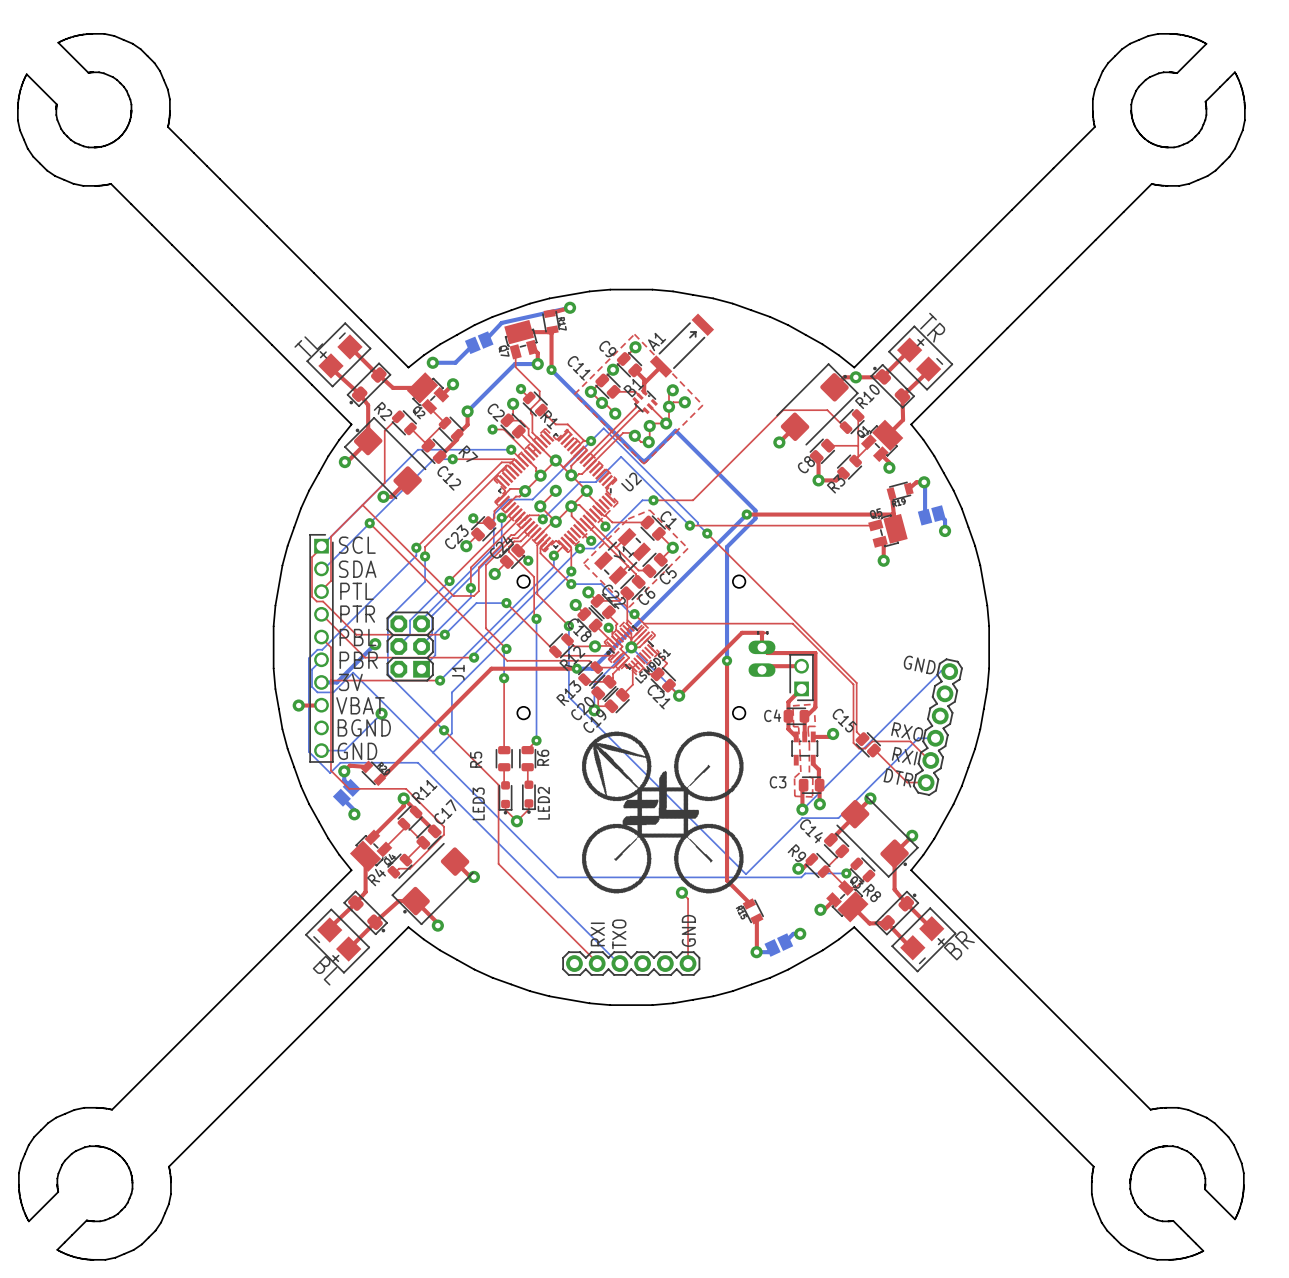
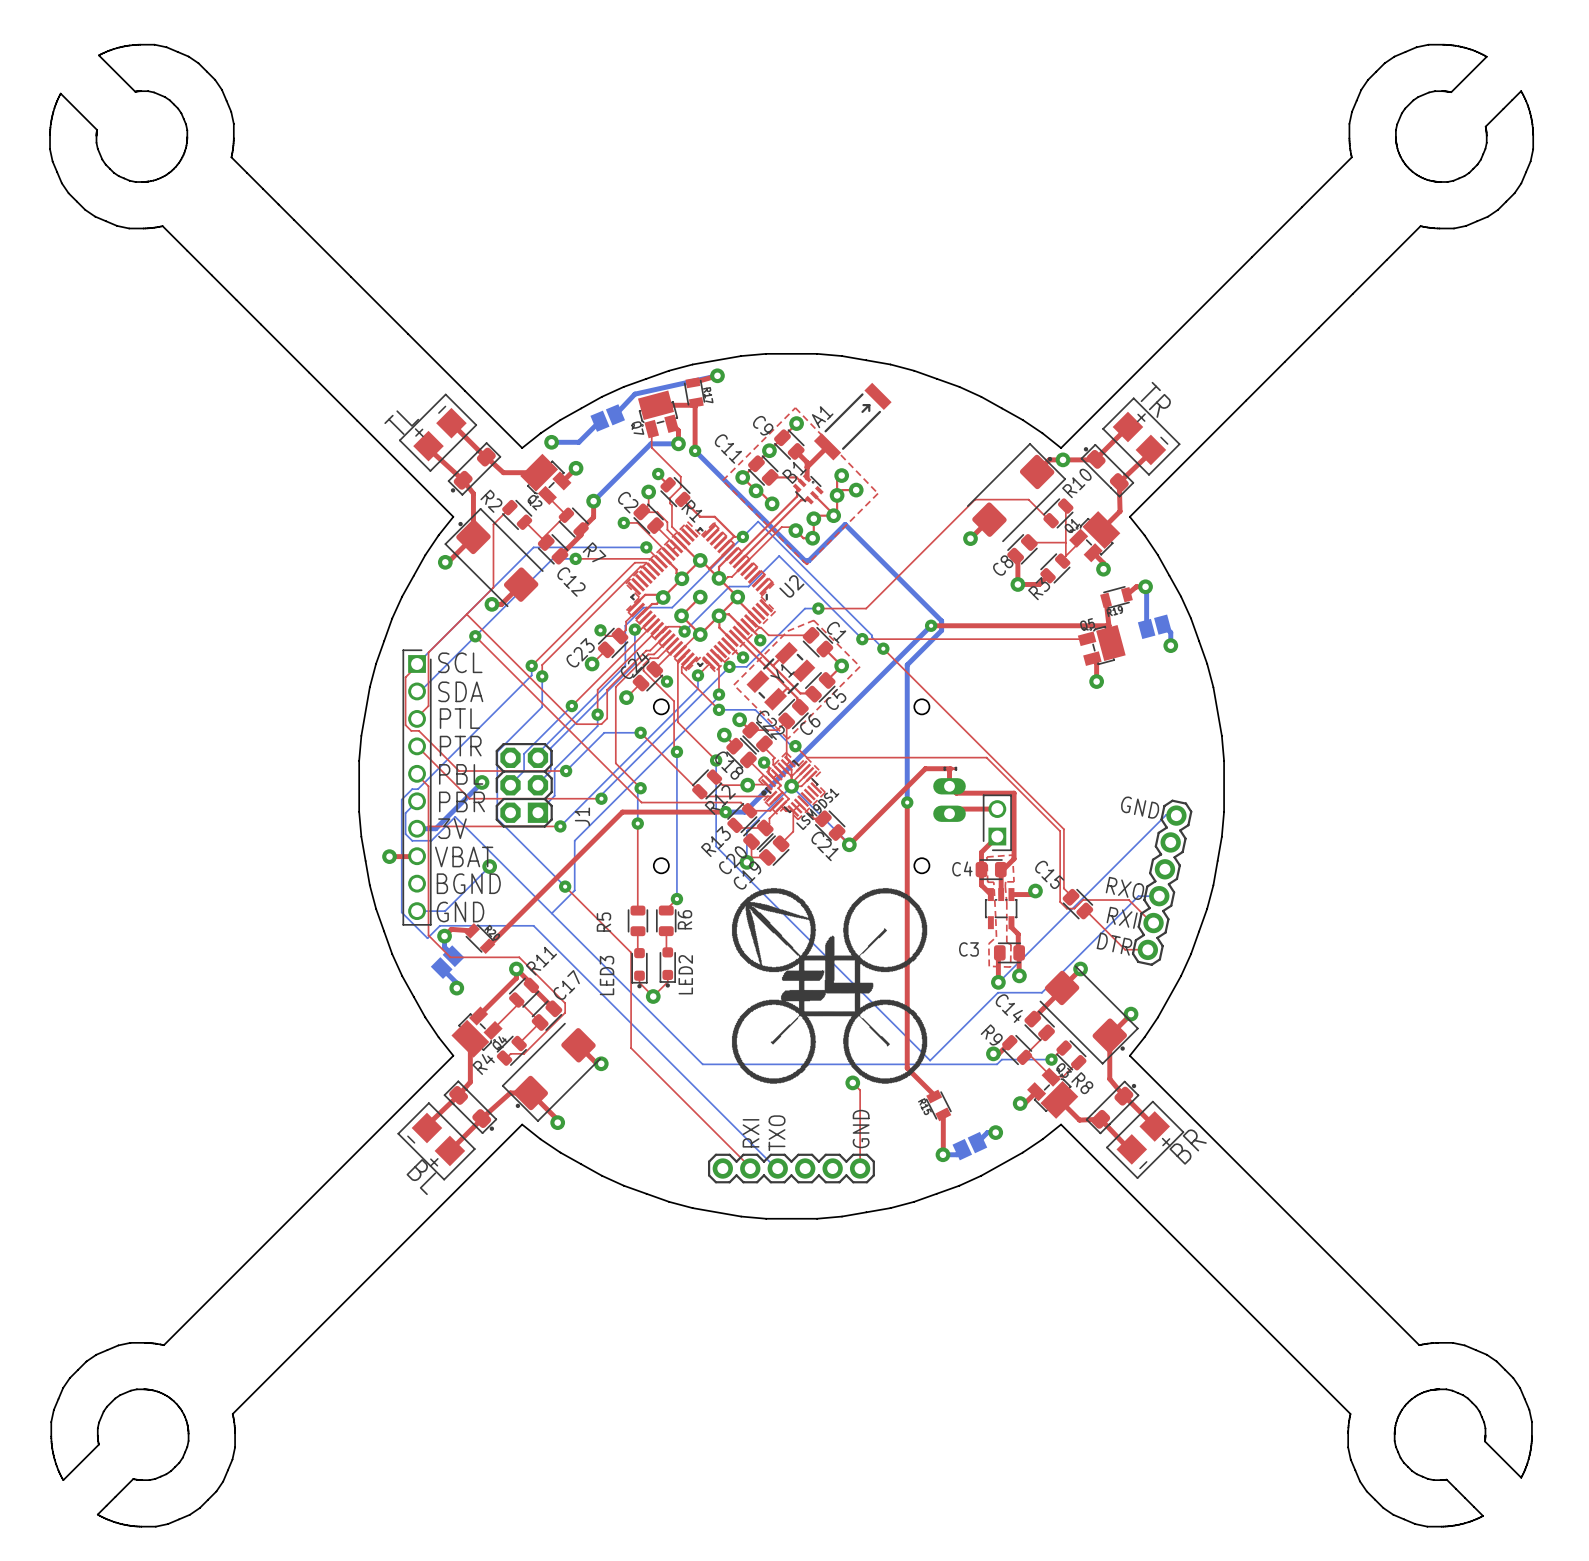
top track: (651, 648) (667, 663) (657, 674) -> none

